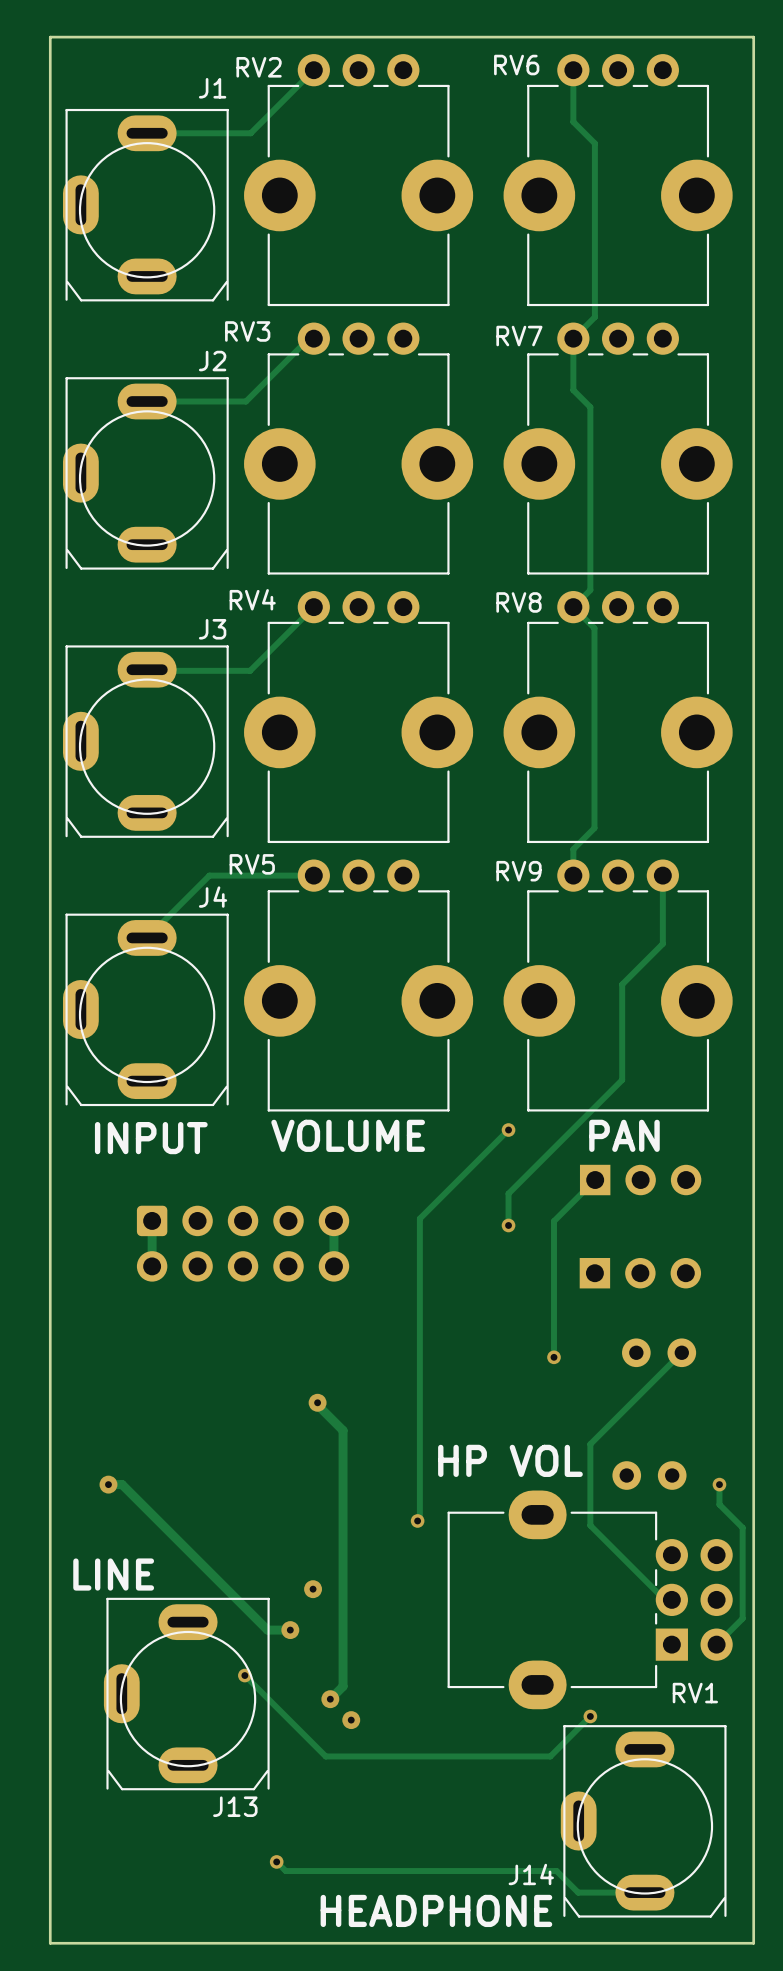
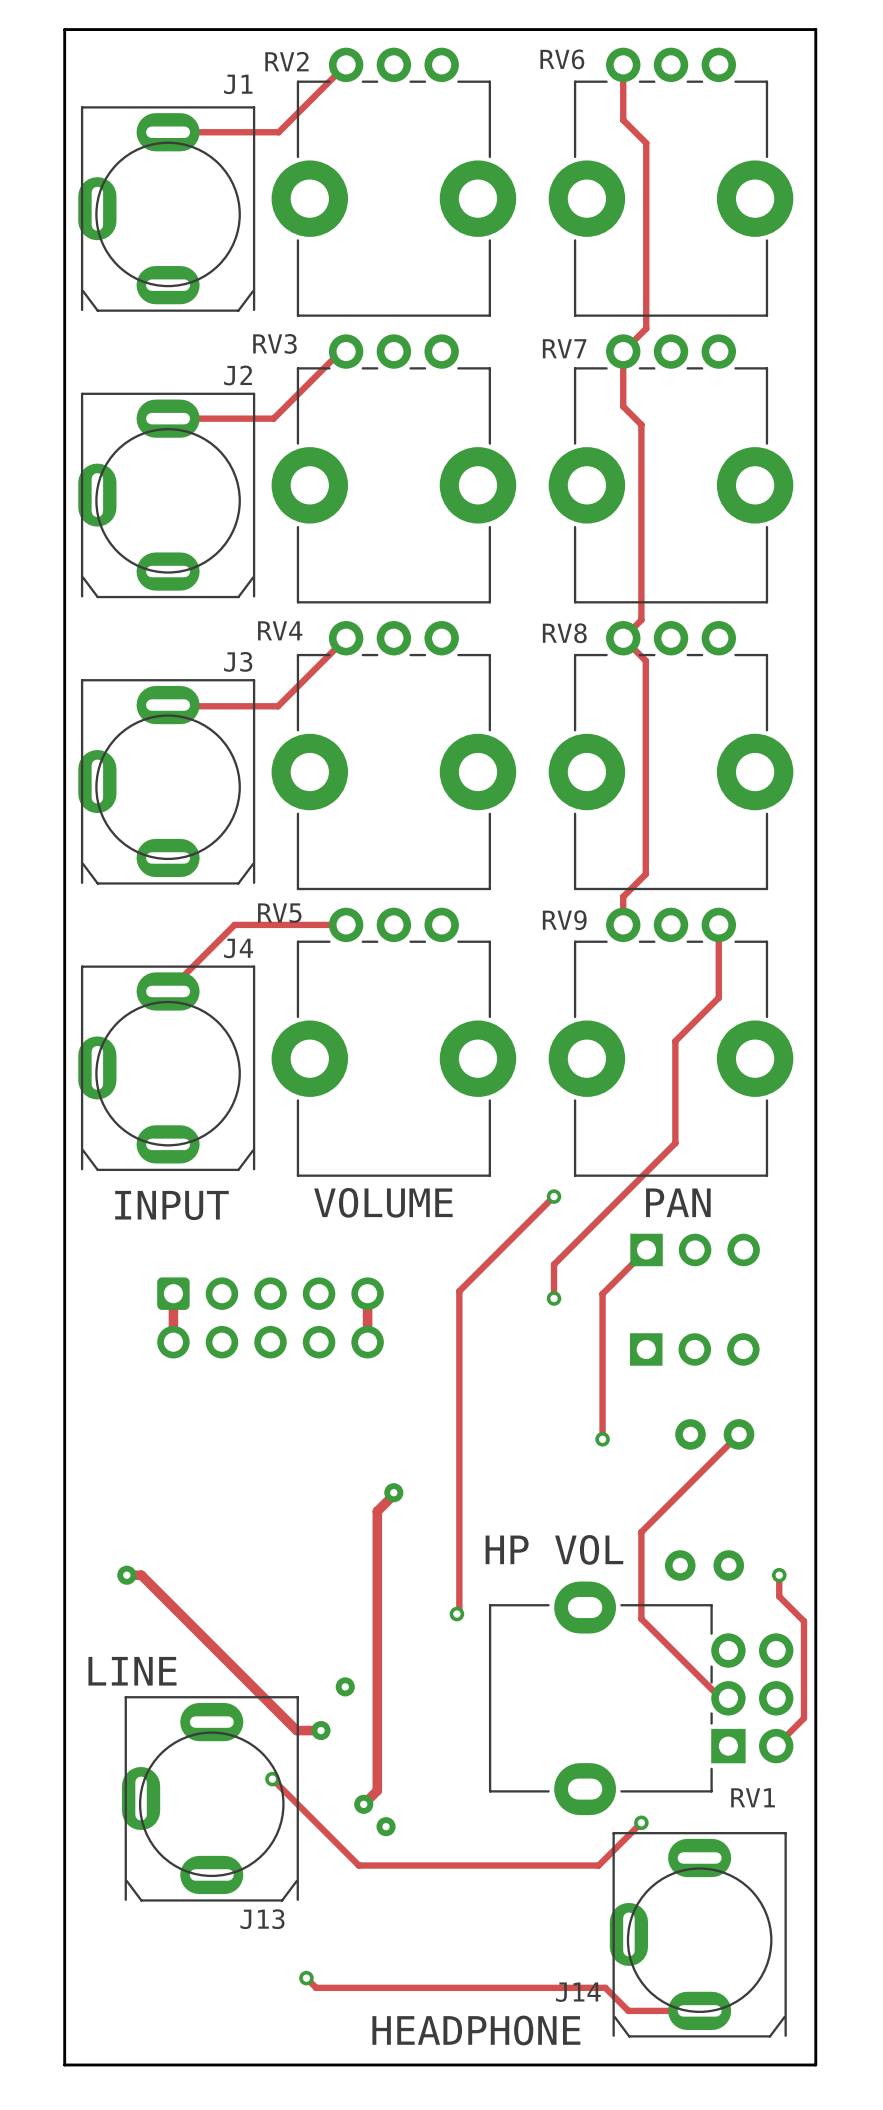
track: (317, 1402) (315, 1402) (343, 1430) -> (393, 1492) (377, 1511) (377, 1517)
via position: (317, 1402) -> (393, 1492)

